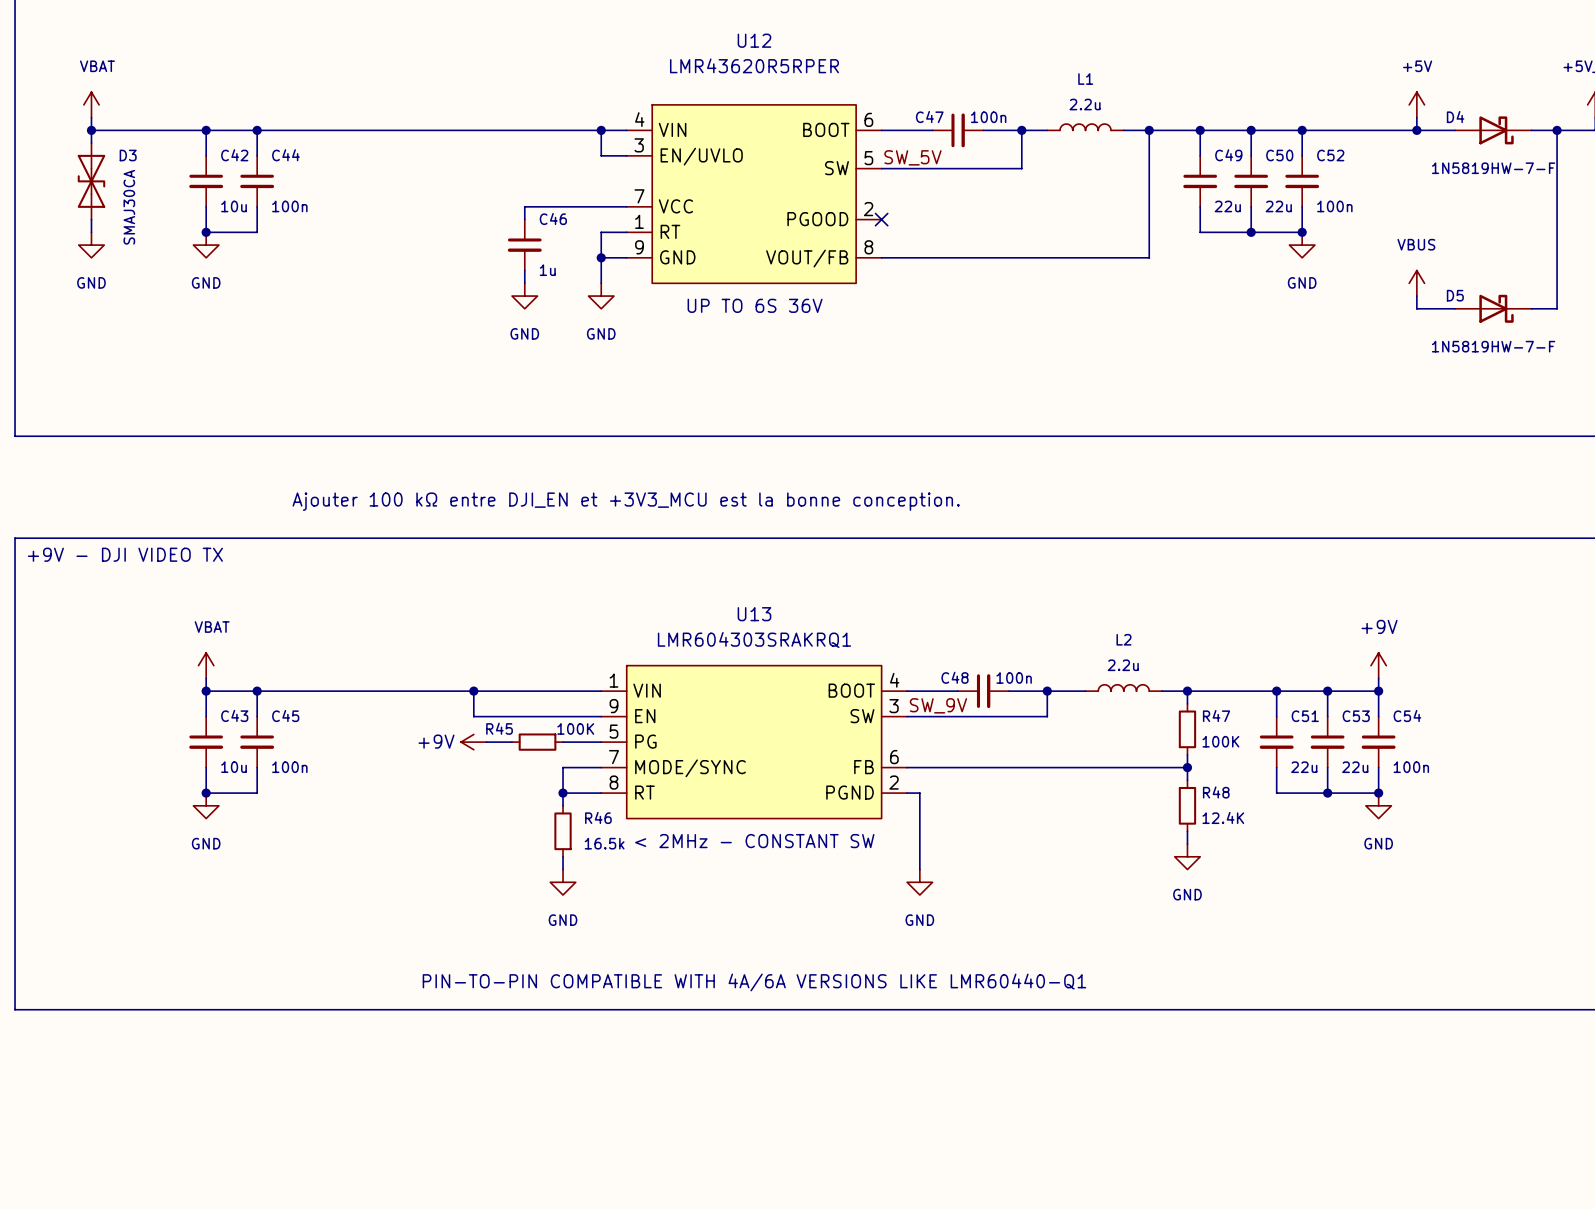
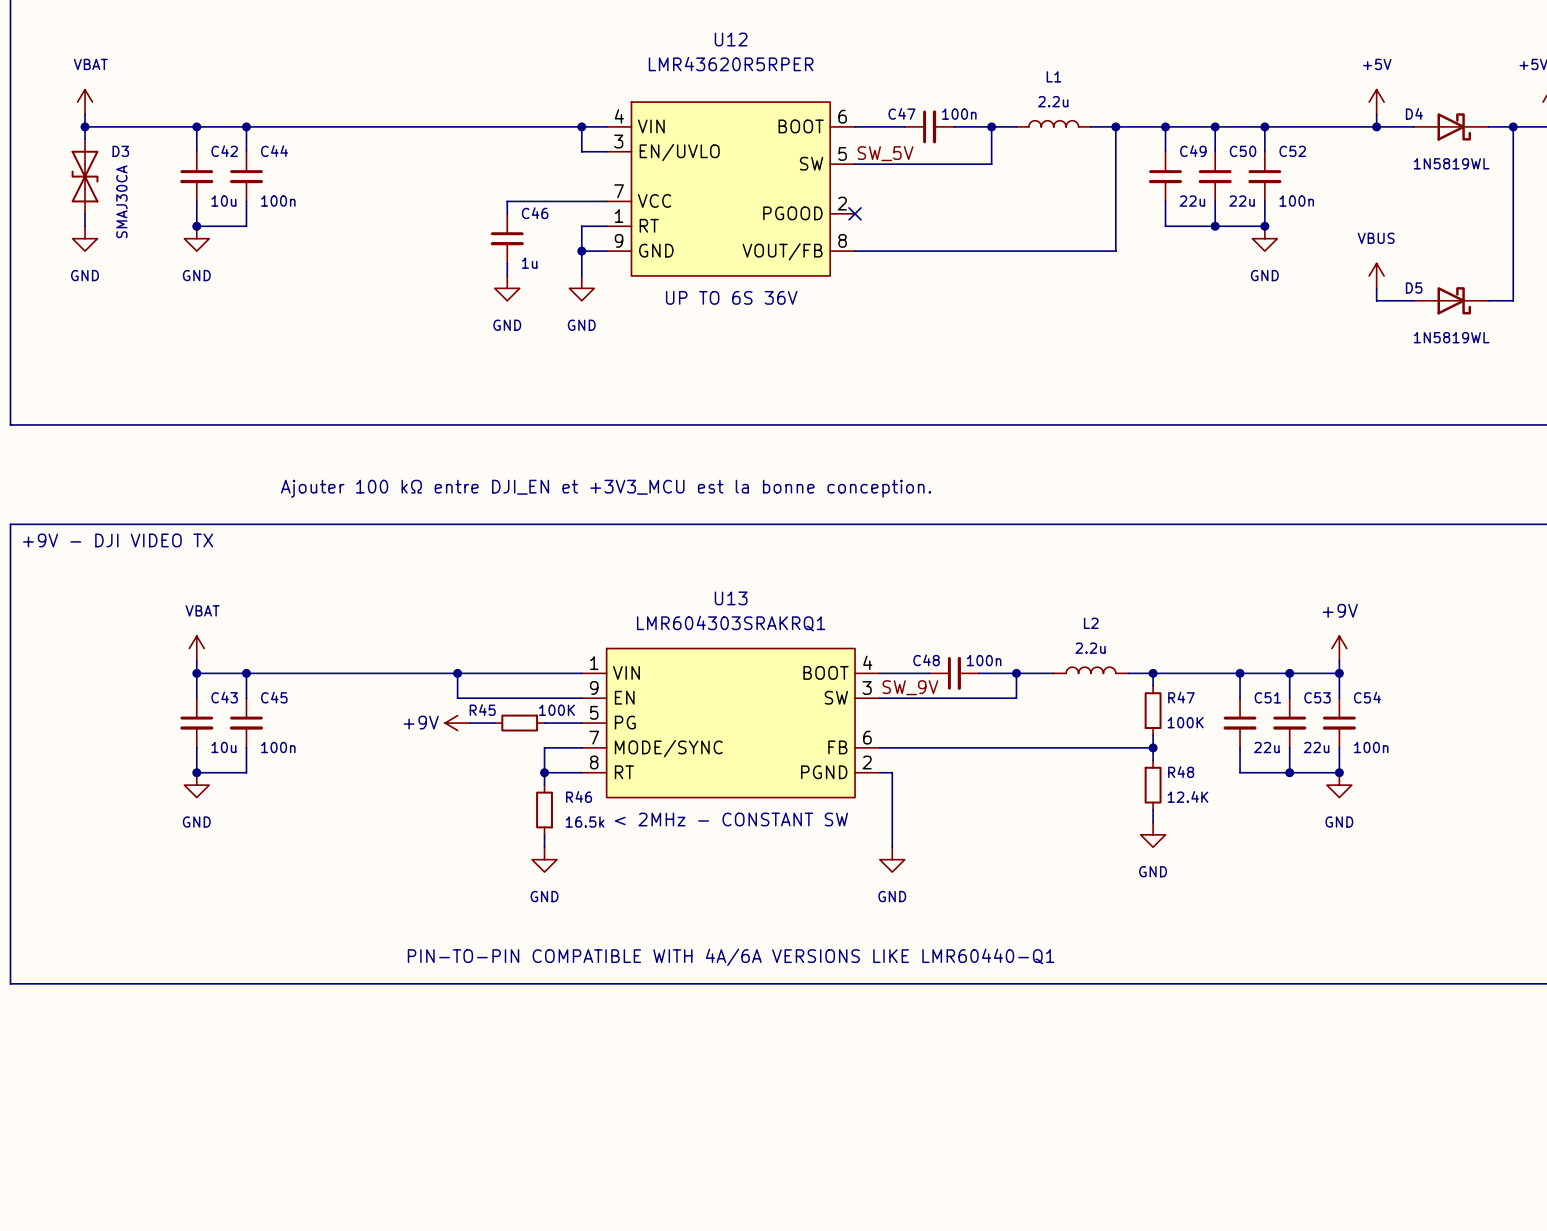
D4 value: 1N5819HW-7-F (1493, 168) -> 1N5819WL (1451, 163)
D5 value: 1N5819HW-7-F (1493, 346) -> 1N5819WL (1451, 337)

